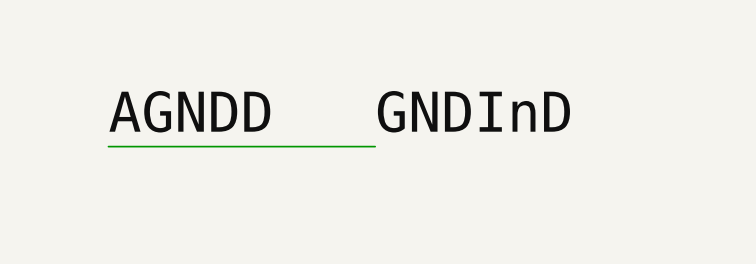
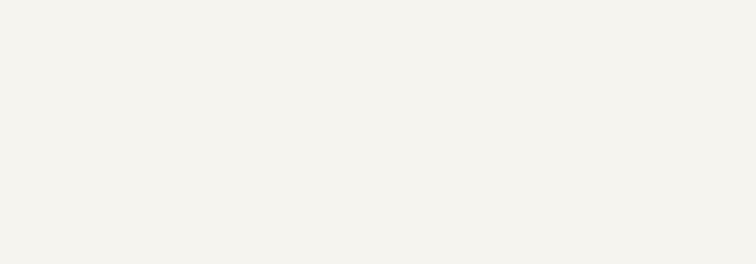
label: AGNDD (189, 111) -> none
label: GNDInD (473, 111) -> none
wire: (108, 146) (375, 146) -> none

